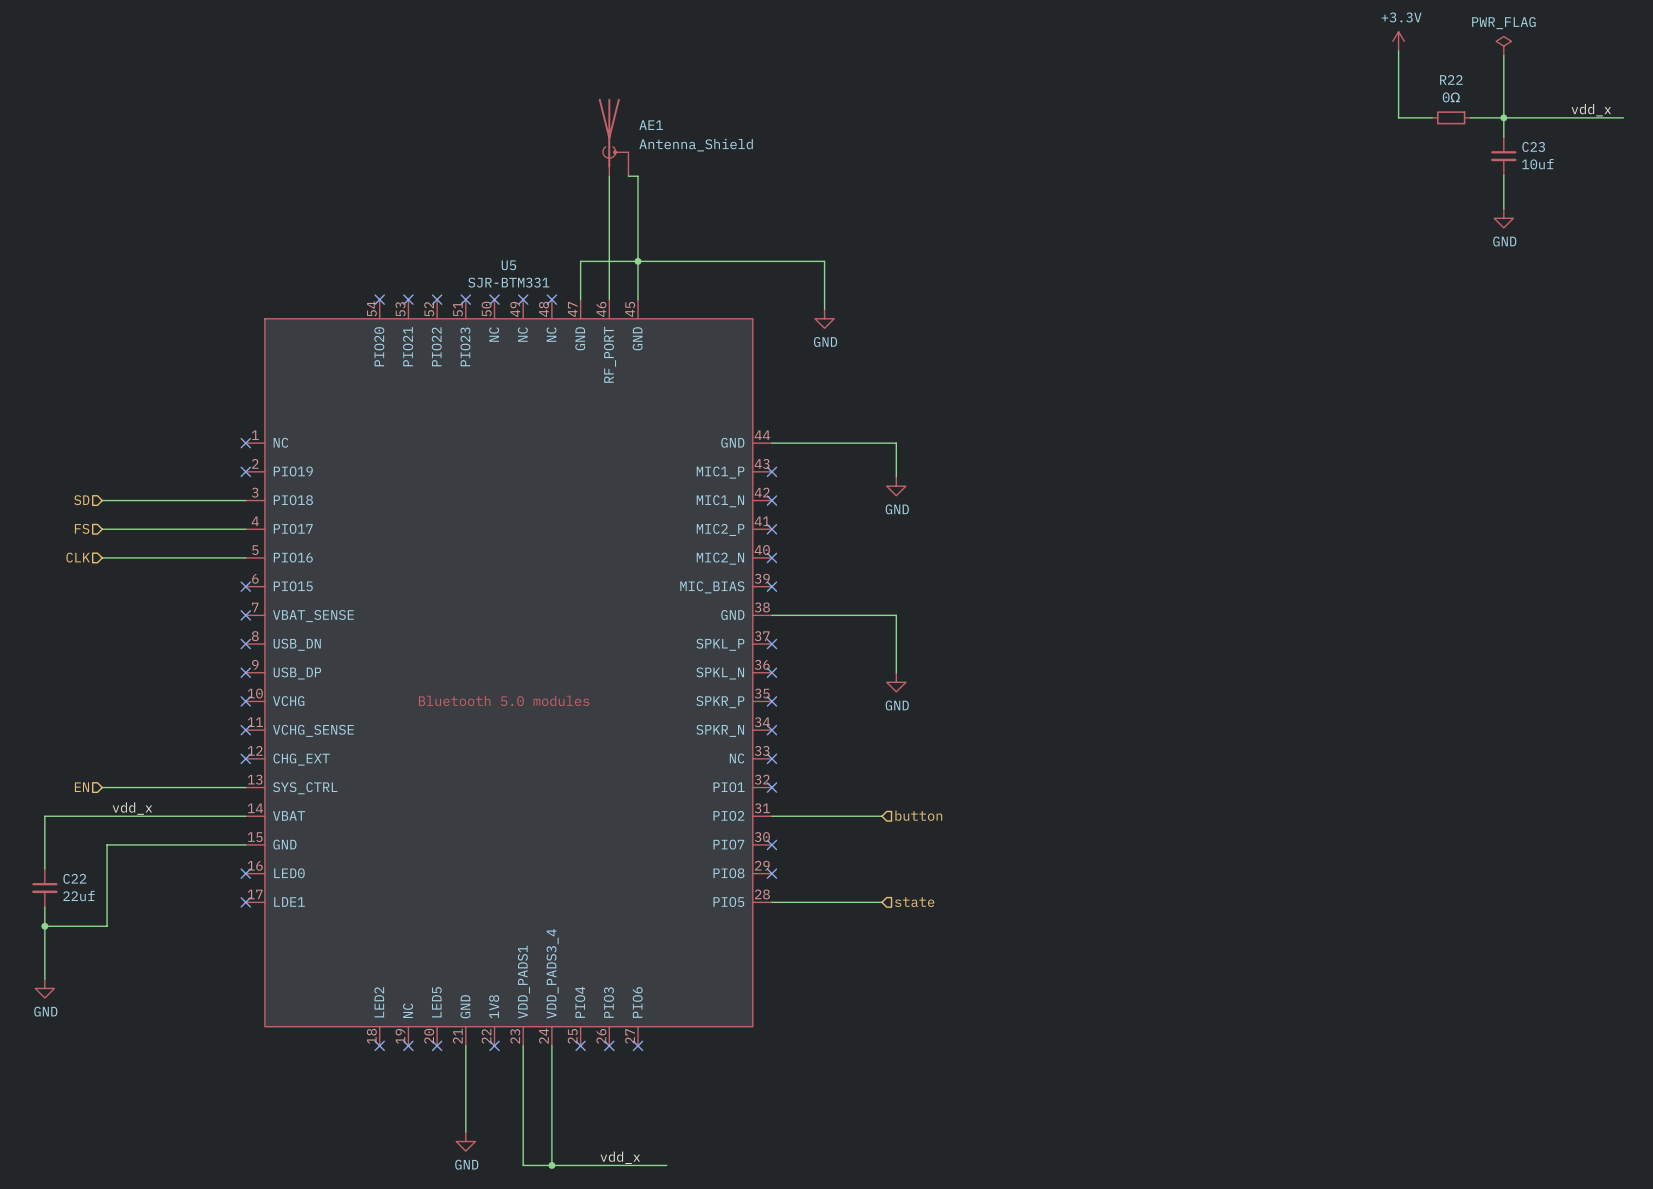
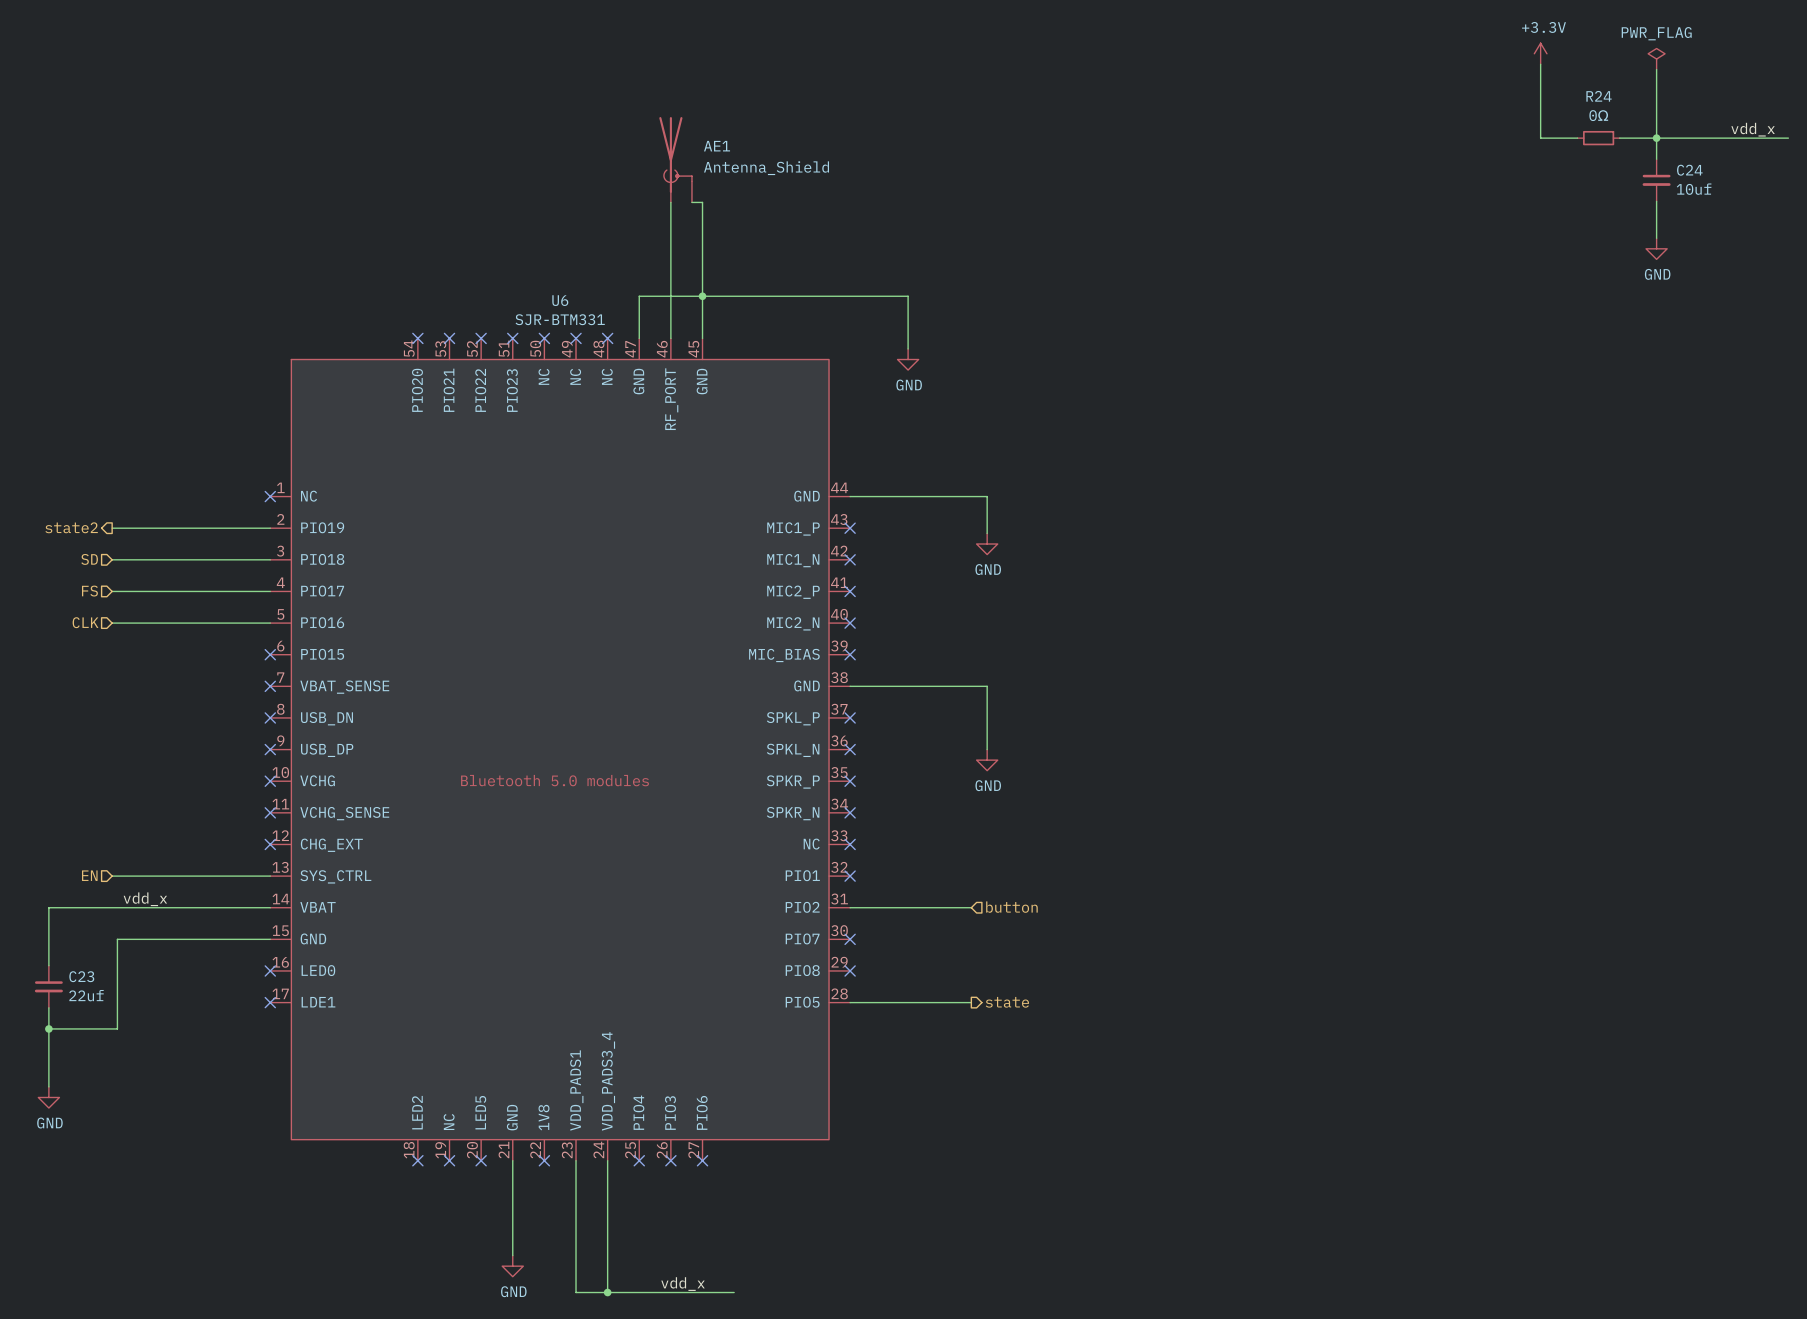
R22 name: R22 (1451, 79) -> R24 (1599, 96)
C23 name: C23 (1533, 146) -> C24 (1689, 170)
U5 name: U5 (508, 265) -> U6 (560, 300)
hierarchical label: none -> state2 (71, 527)
wire: none -> (112, 528) (270, 528)
no-connect mark: (245, 471) -> none
C22 name: C22 (74, 878) -> C23 (81, 976)
hierarchical label shape: input (914, 902) -> output (1007, 1002)

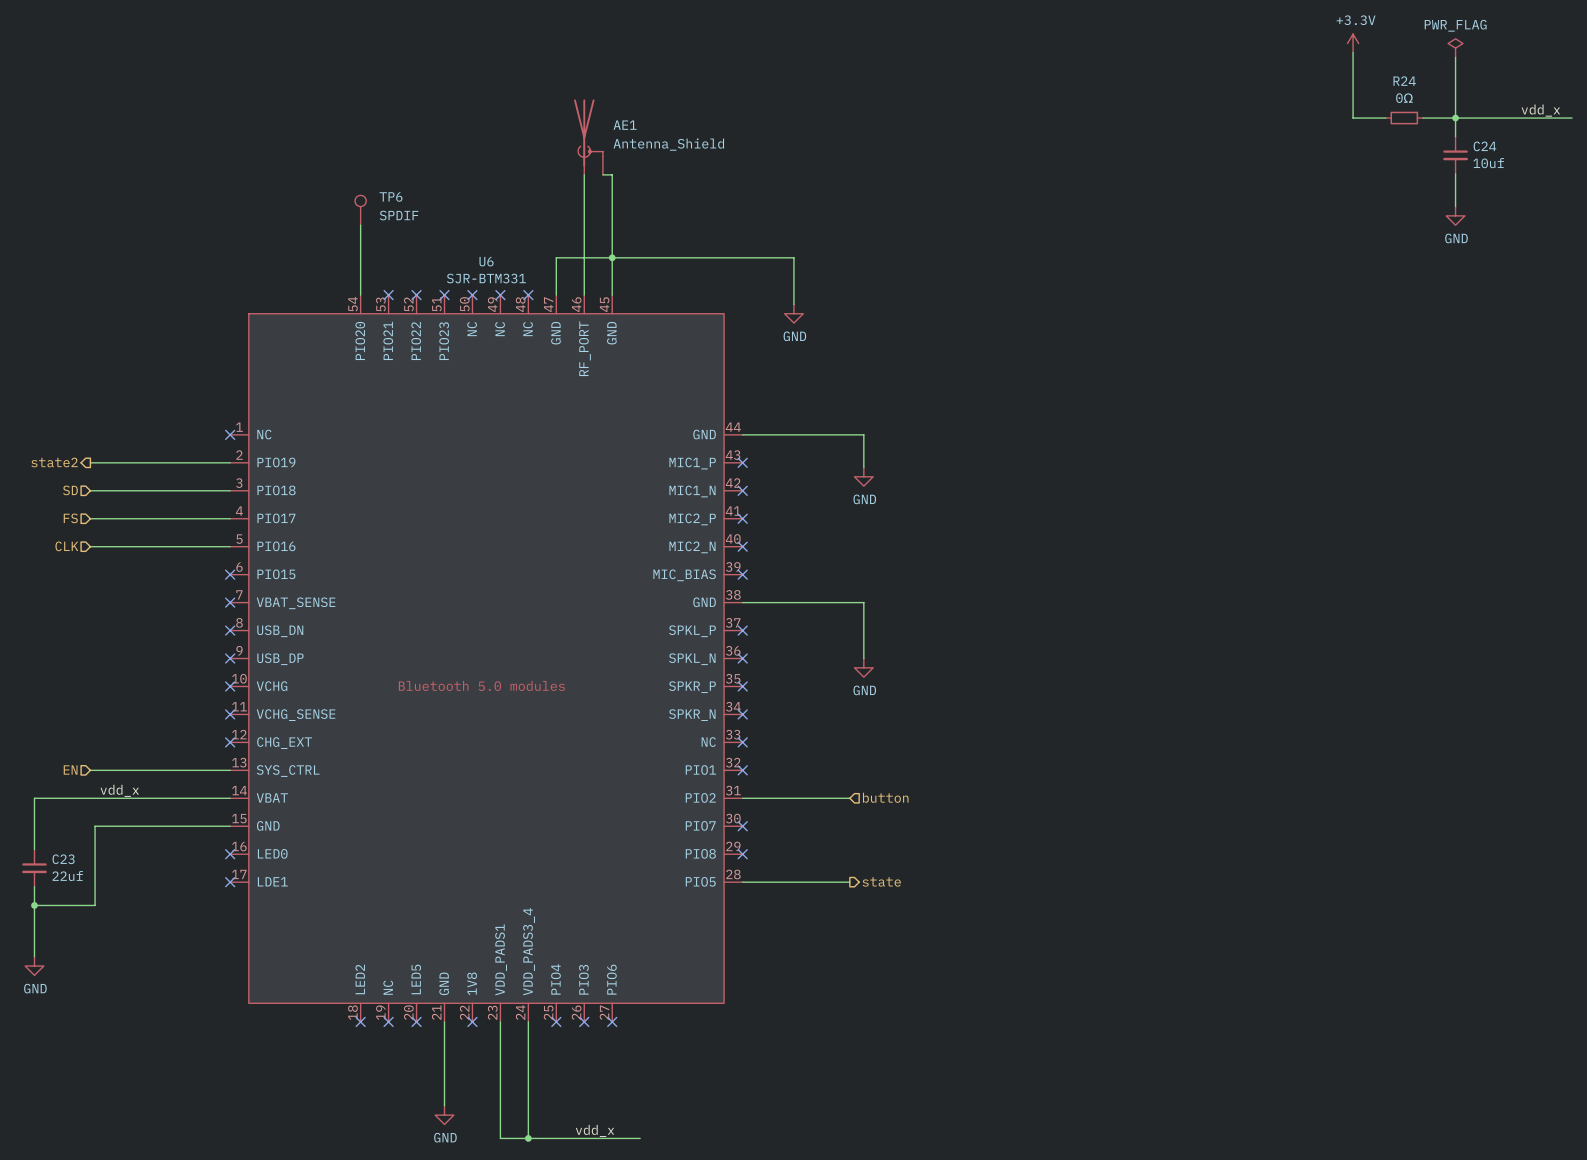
TP6: none -> SPDIF (360, 210)
wire: none -> (360, 225) (360, 295)
no-connect mark: (417, 338) -> none

